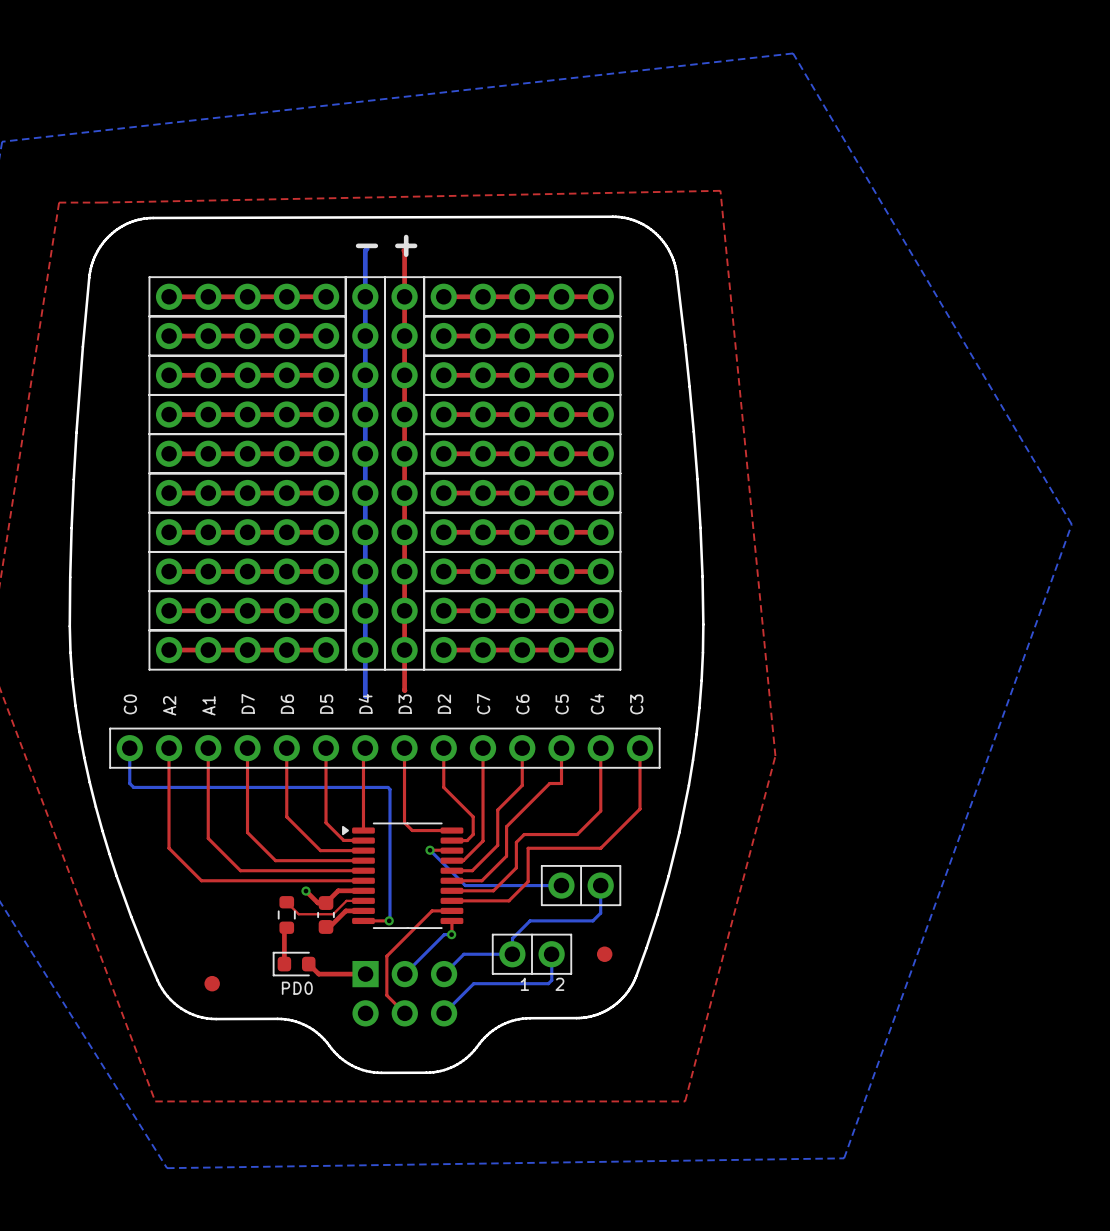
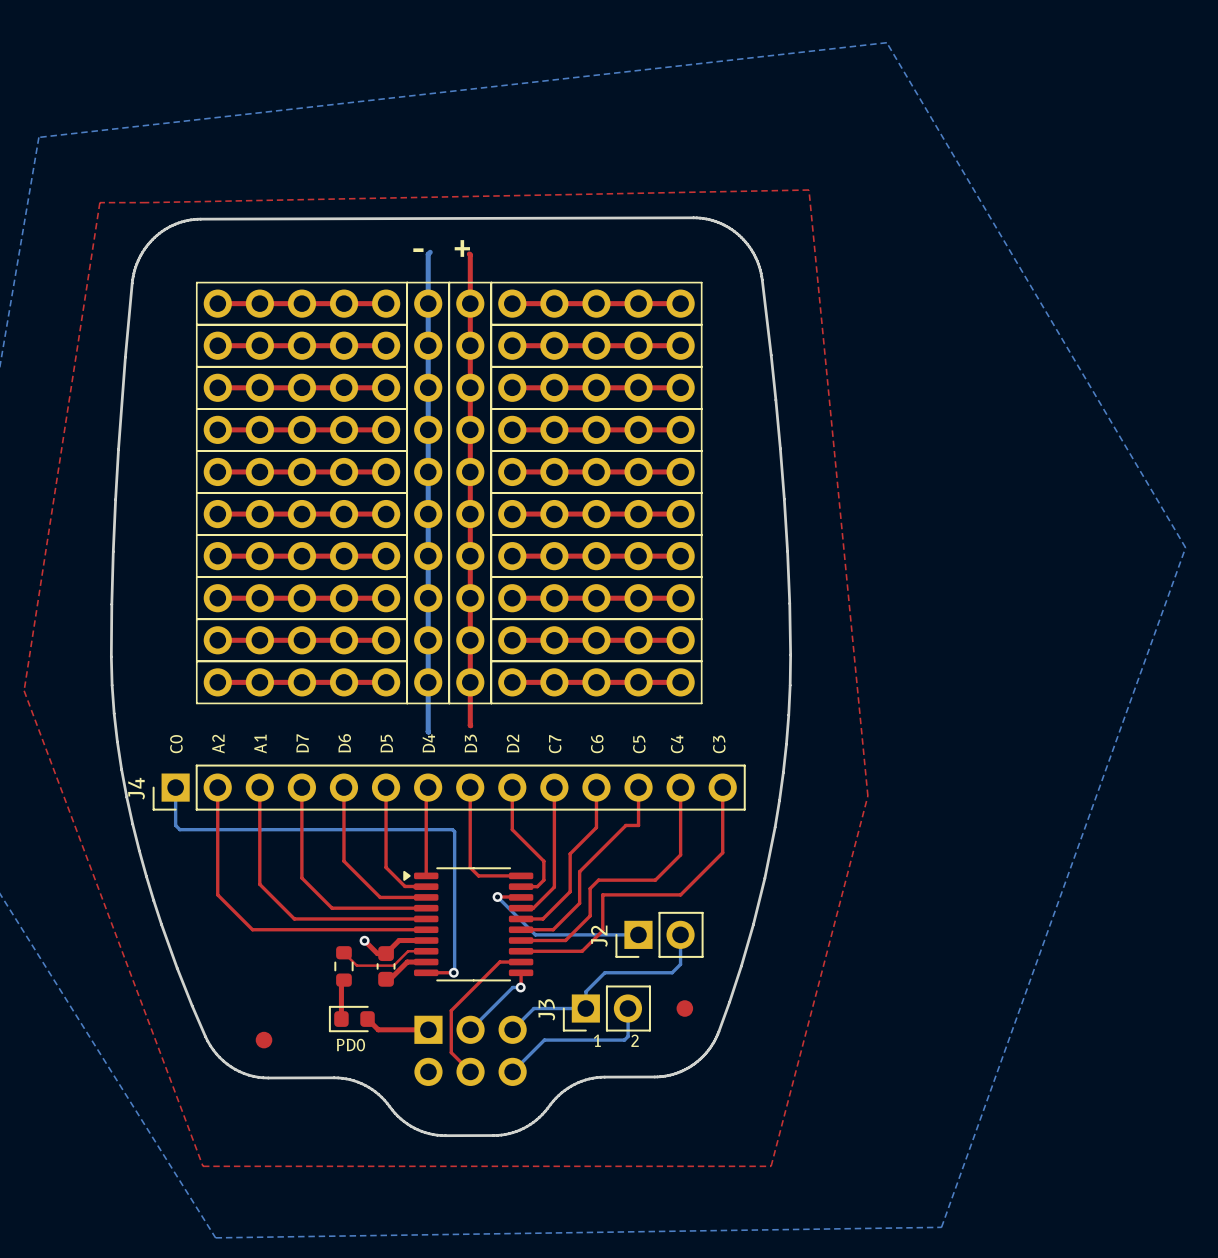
part: (384, 748) -> none
J4: none -> (449, 787)
part: (581, 885) -> none
J2: none -> (659, 934)
part: (532, 954) -> none
J3: none -> (606, 1008)

